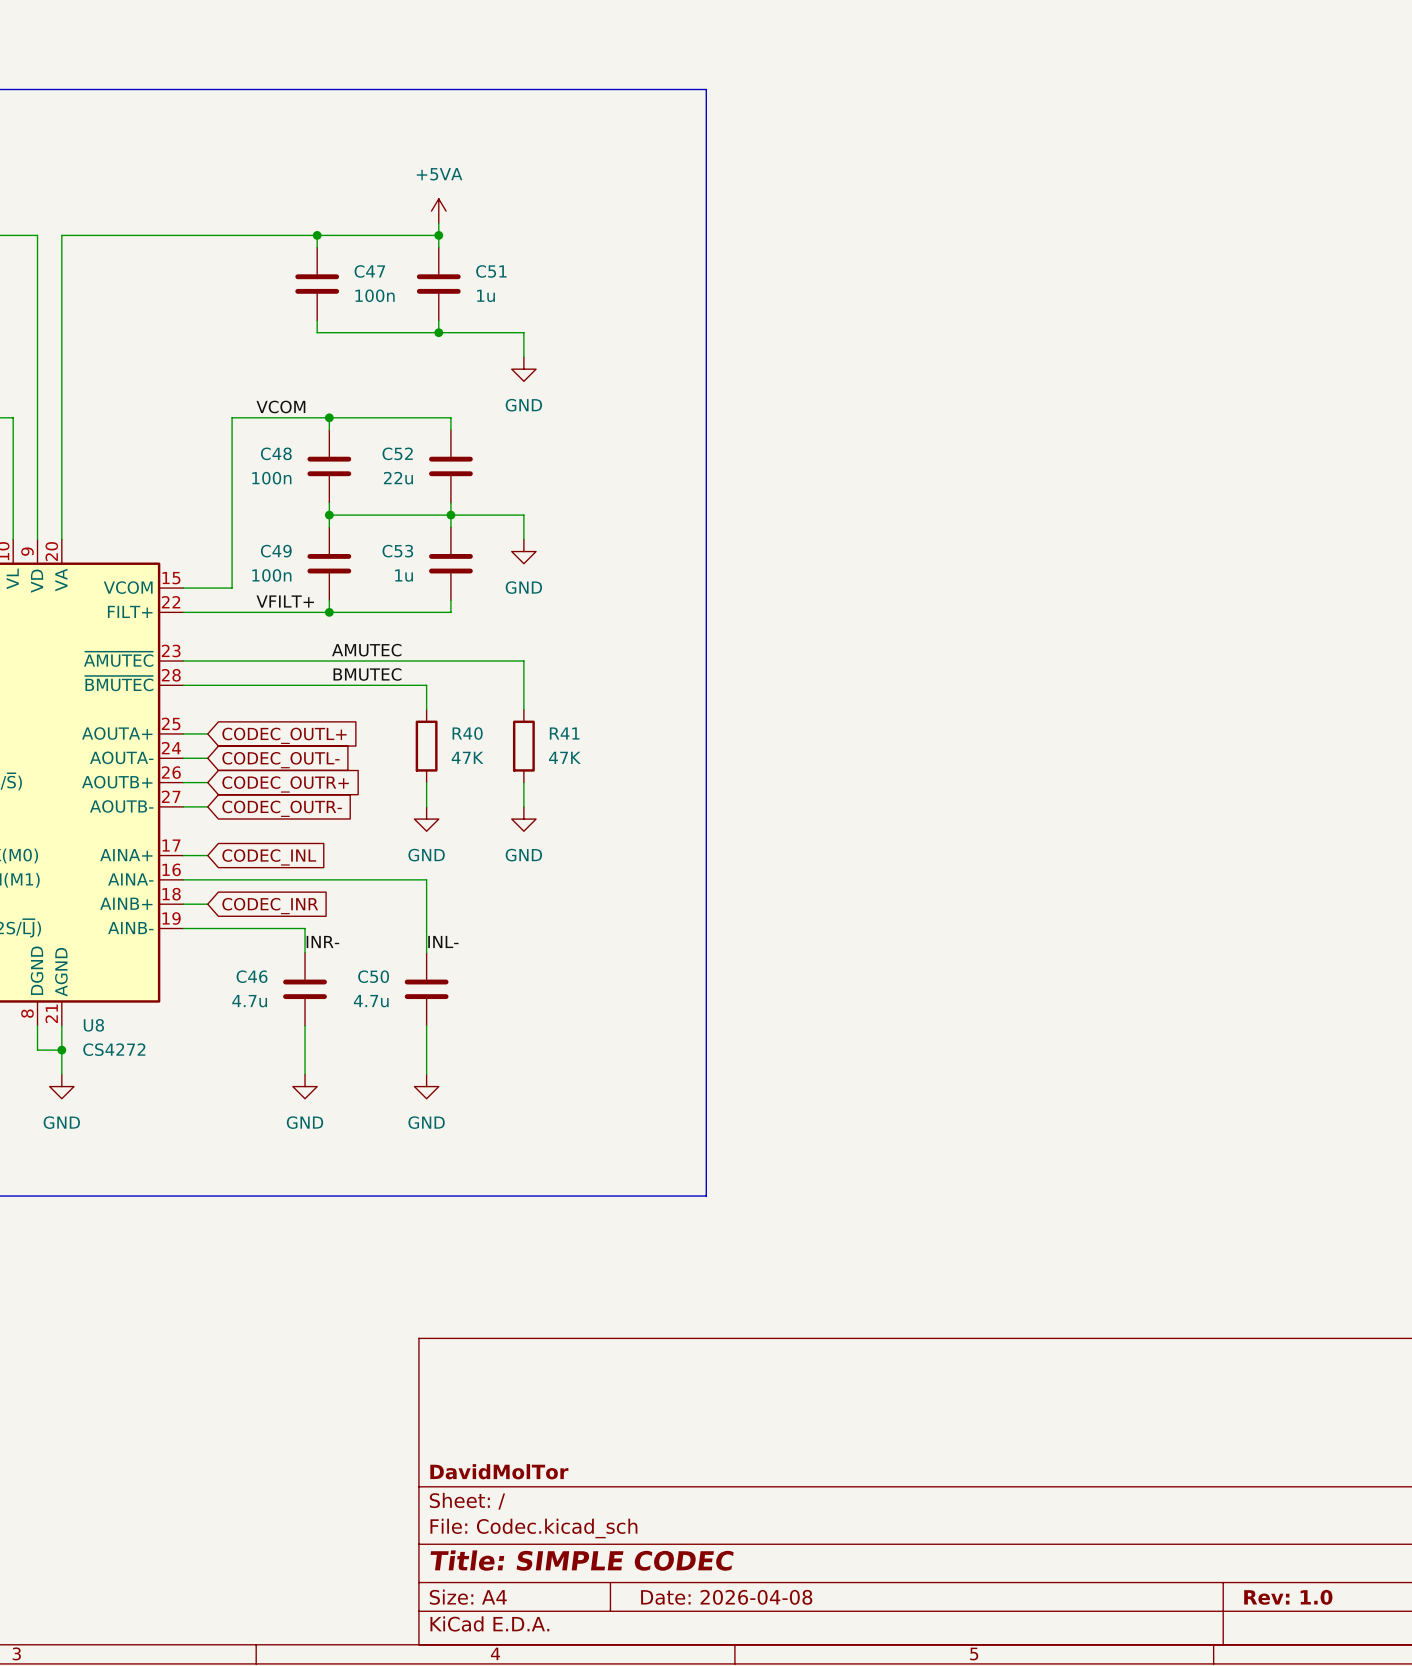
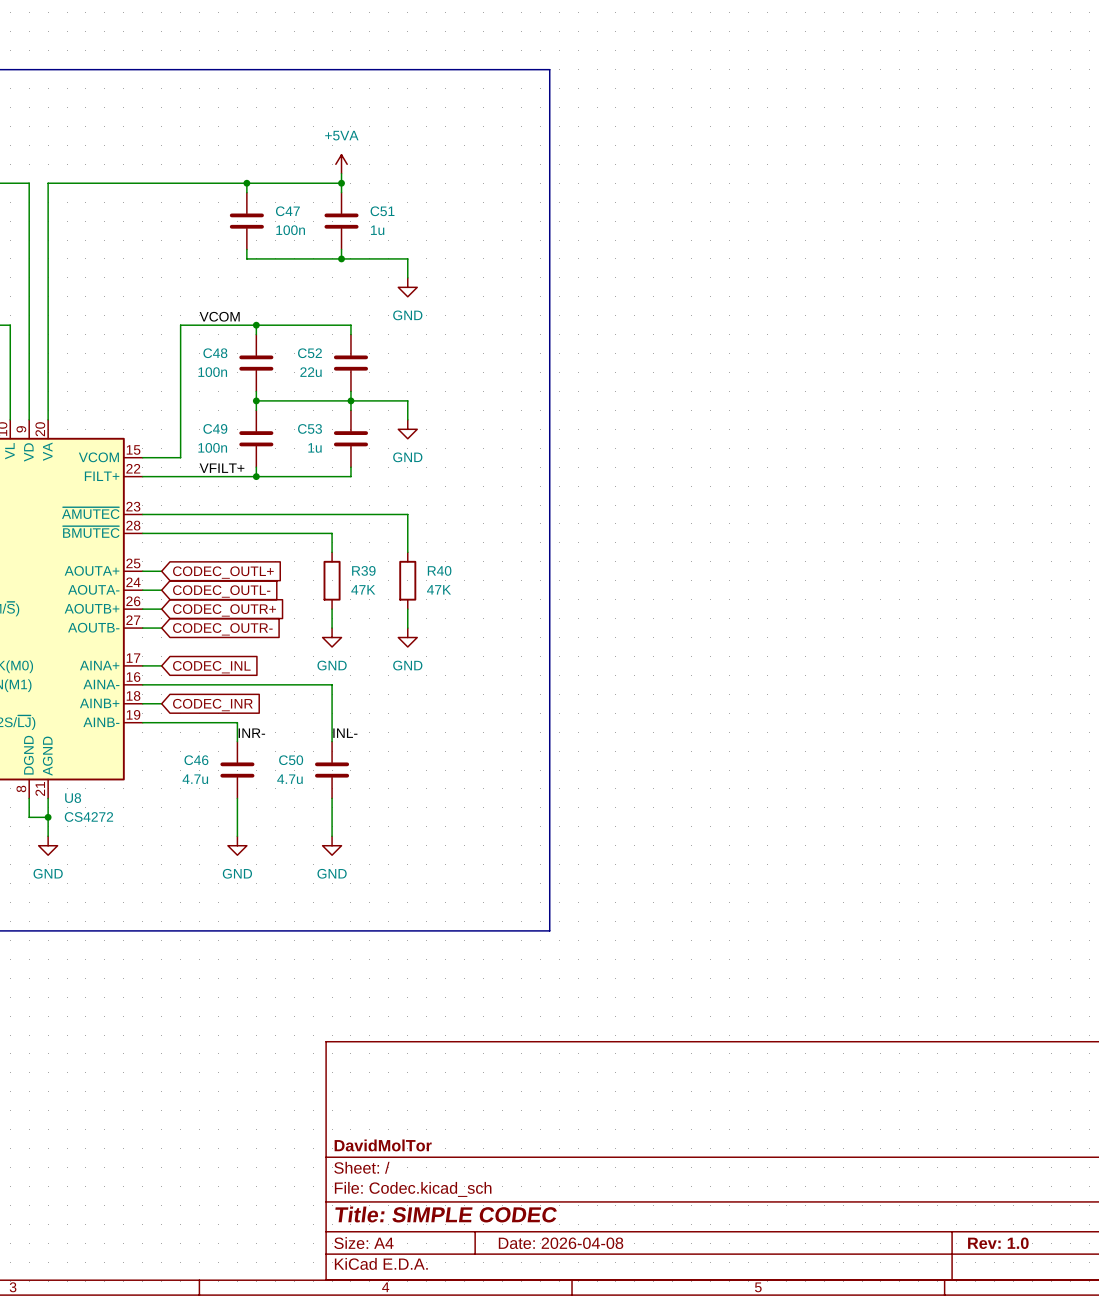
label: AMUTEC (366, 650) -> none
label: BMUTEC (367, 674) -> none
R40 name: R40 (467, 733) -> R39 (363, 570)
R41 name: R41 (564, 733) -> R40 (439, 570)

